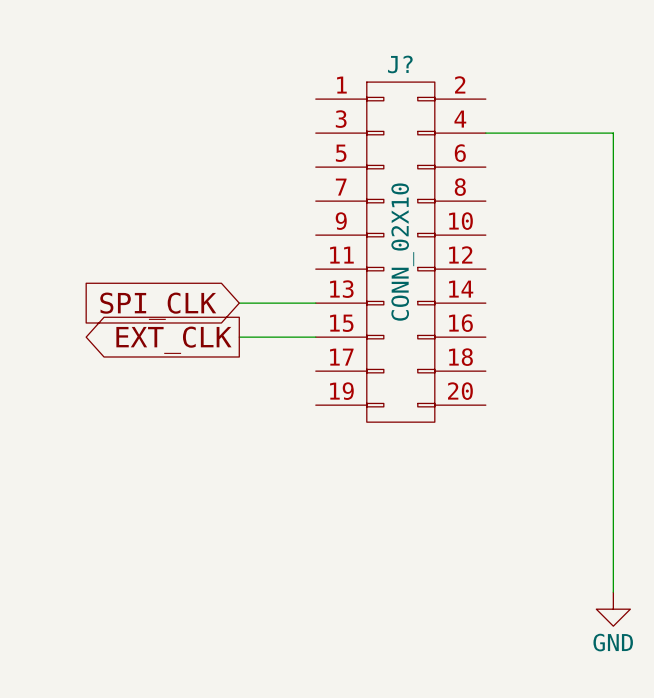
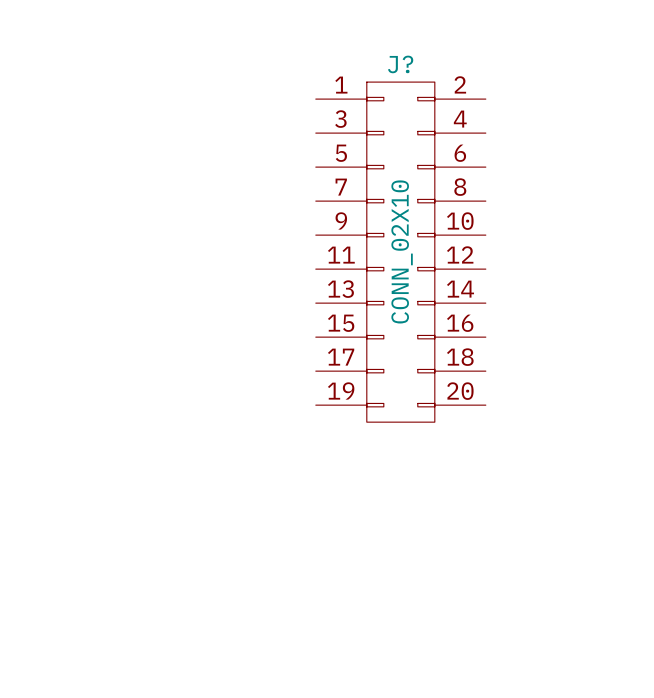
wire: (485, 133) (613, 133) (613, 592) -> none
wire: (239, 303) (315, 303) -> none
global label: SPI_CLK (158, 306) -> none
wire: (239, 337) (315, 337) -> none
global label: EXT_CLK (173, 340) -> none
power symbol: GND (613, 609) -> none

